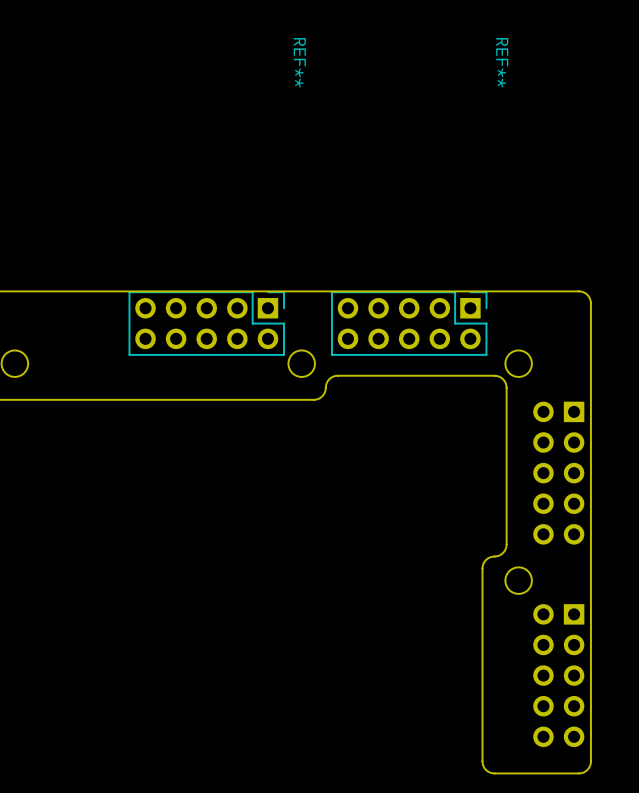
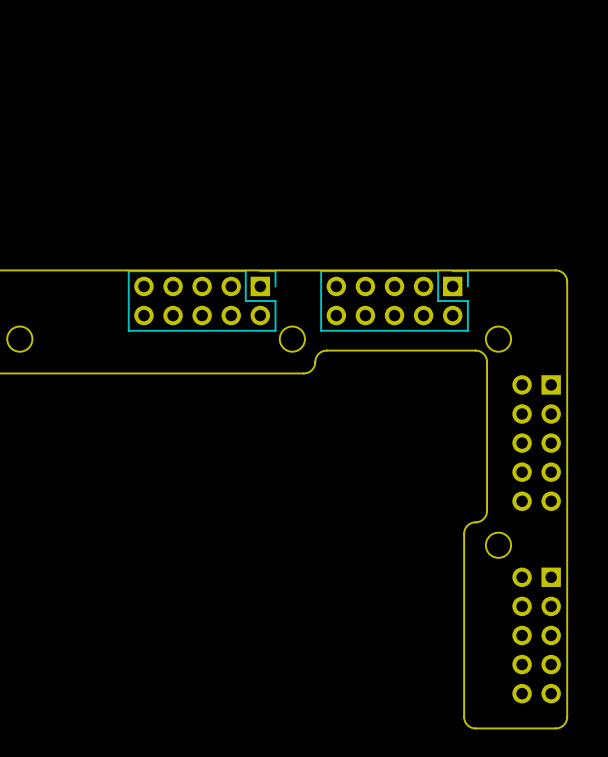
REF** name: REF** (299, 62) -> none
REF** name: REF** (502, 62) -> none

